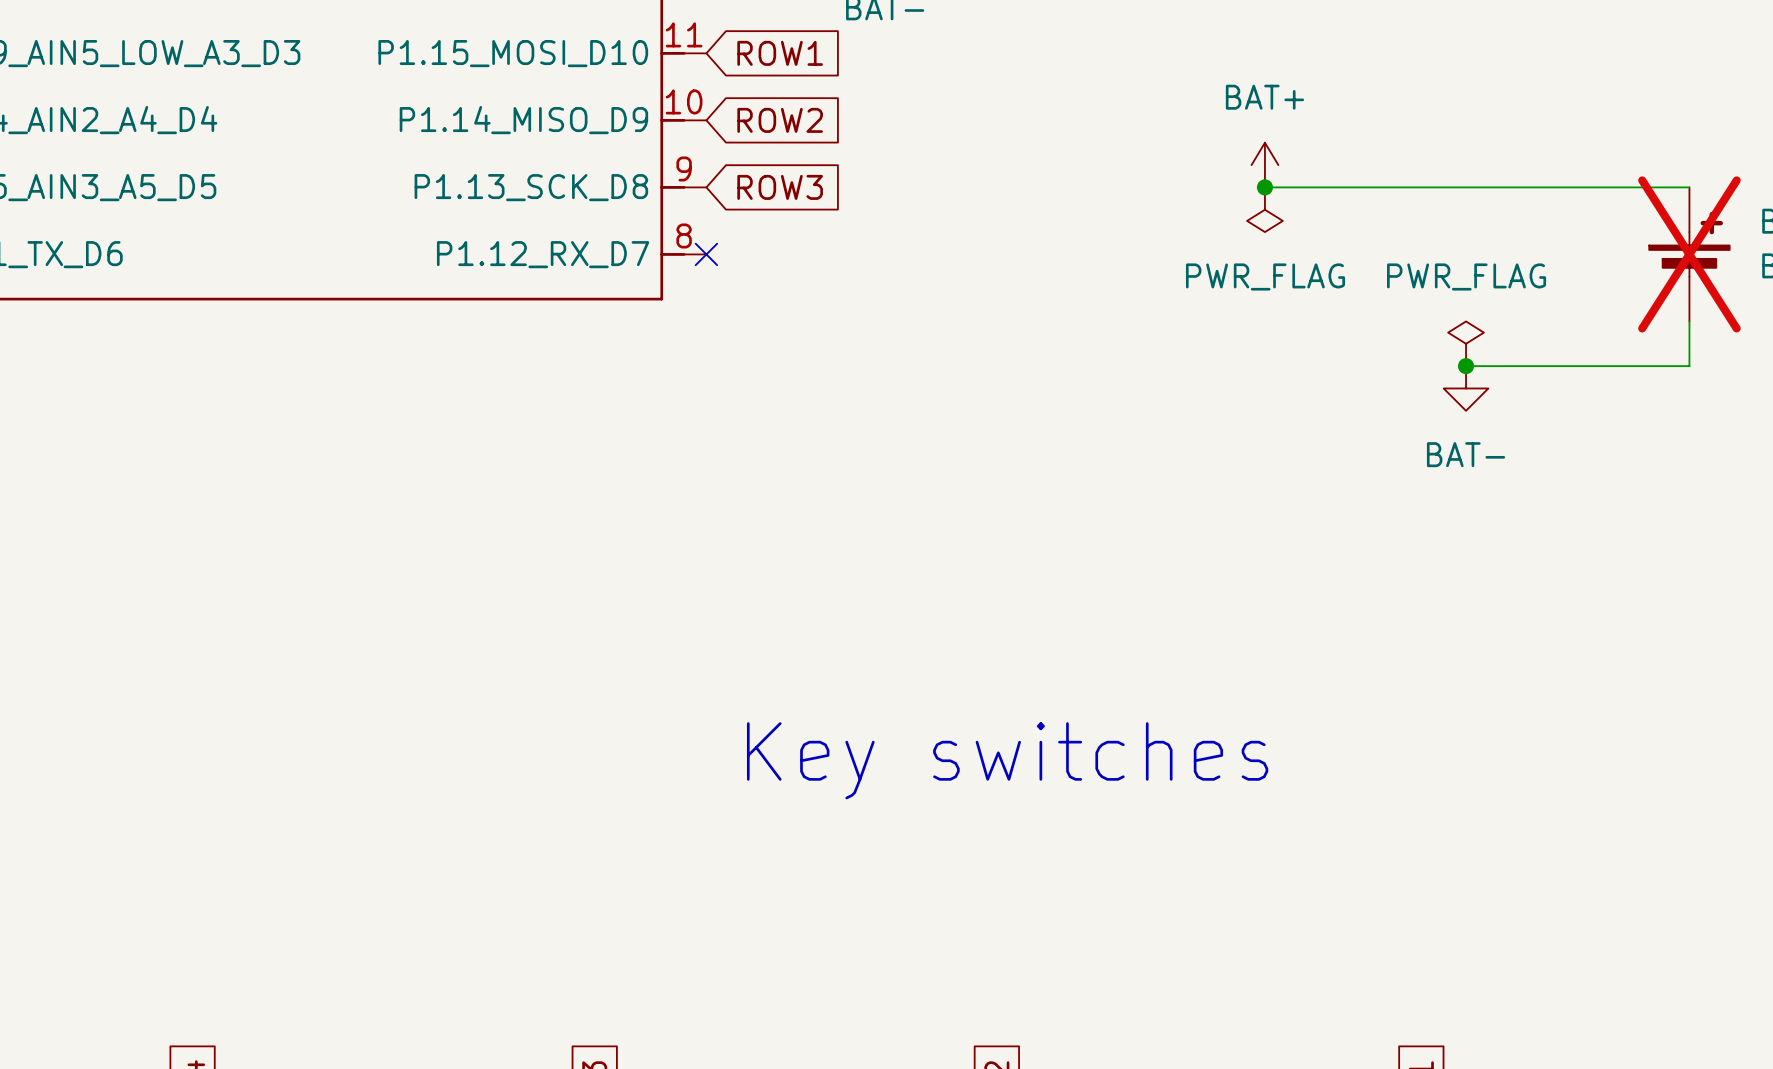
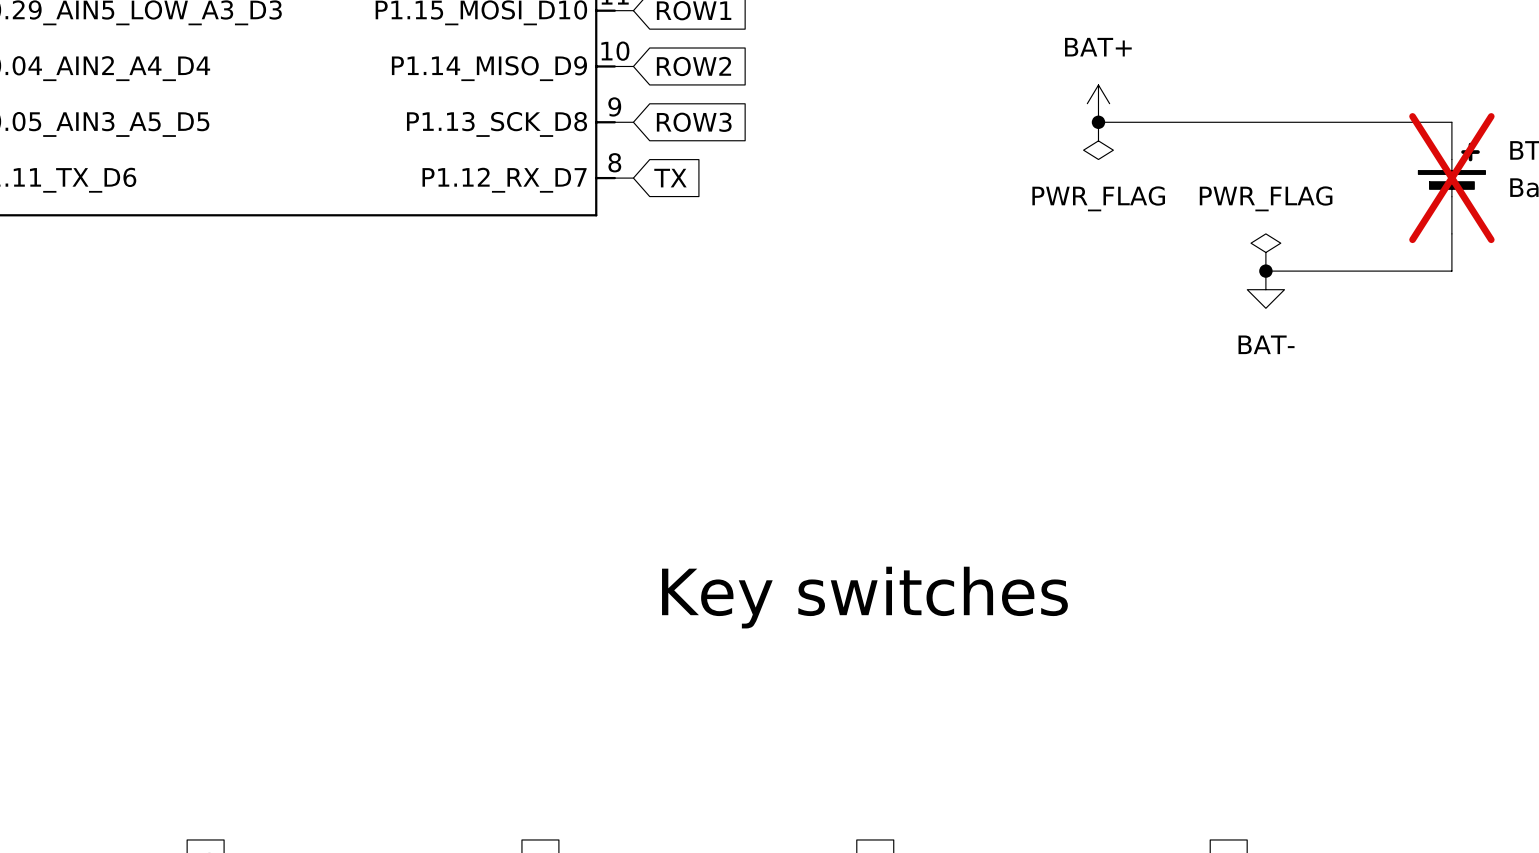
no-connect mark: (706, 254) -> none
global label: none -> TX (670, 178)

